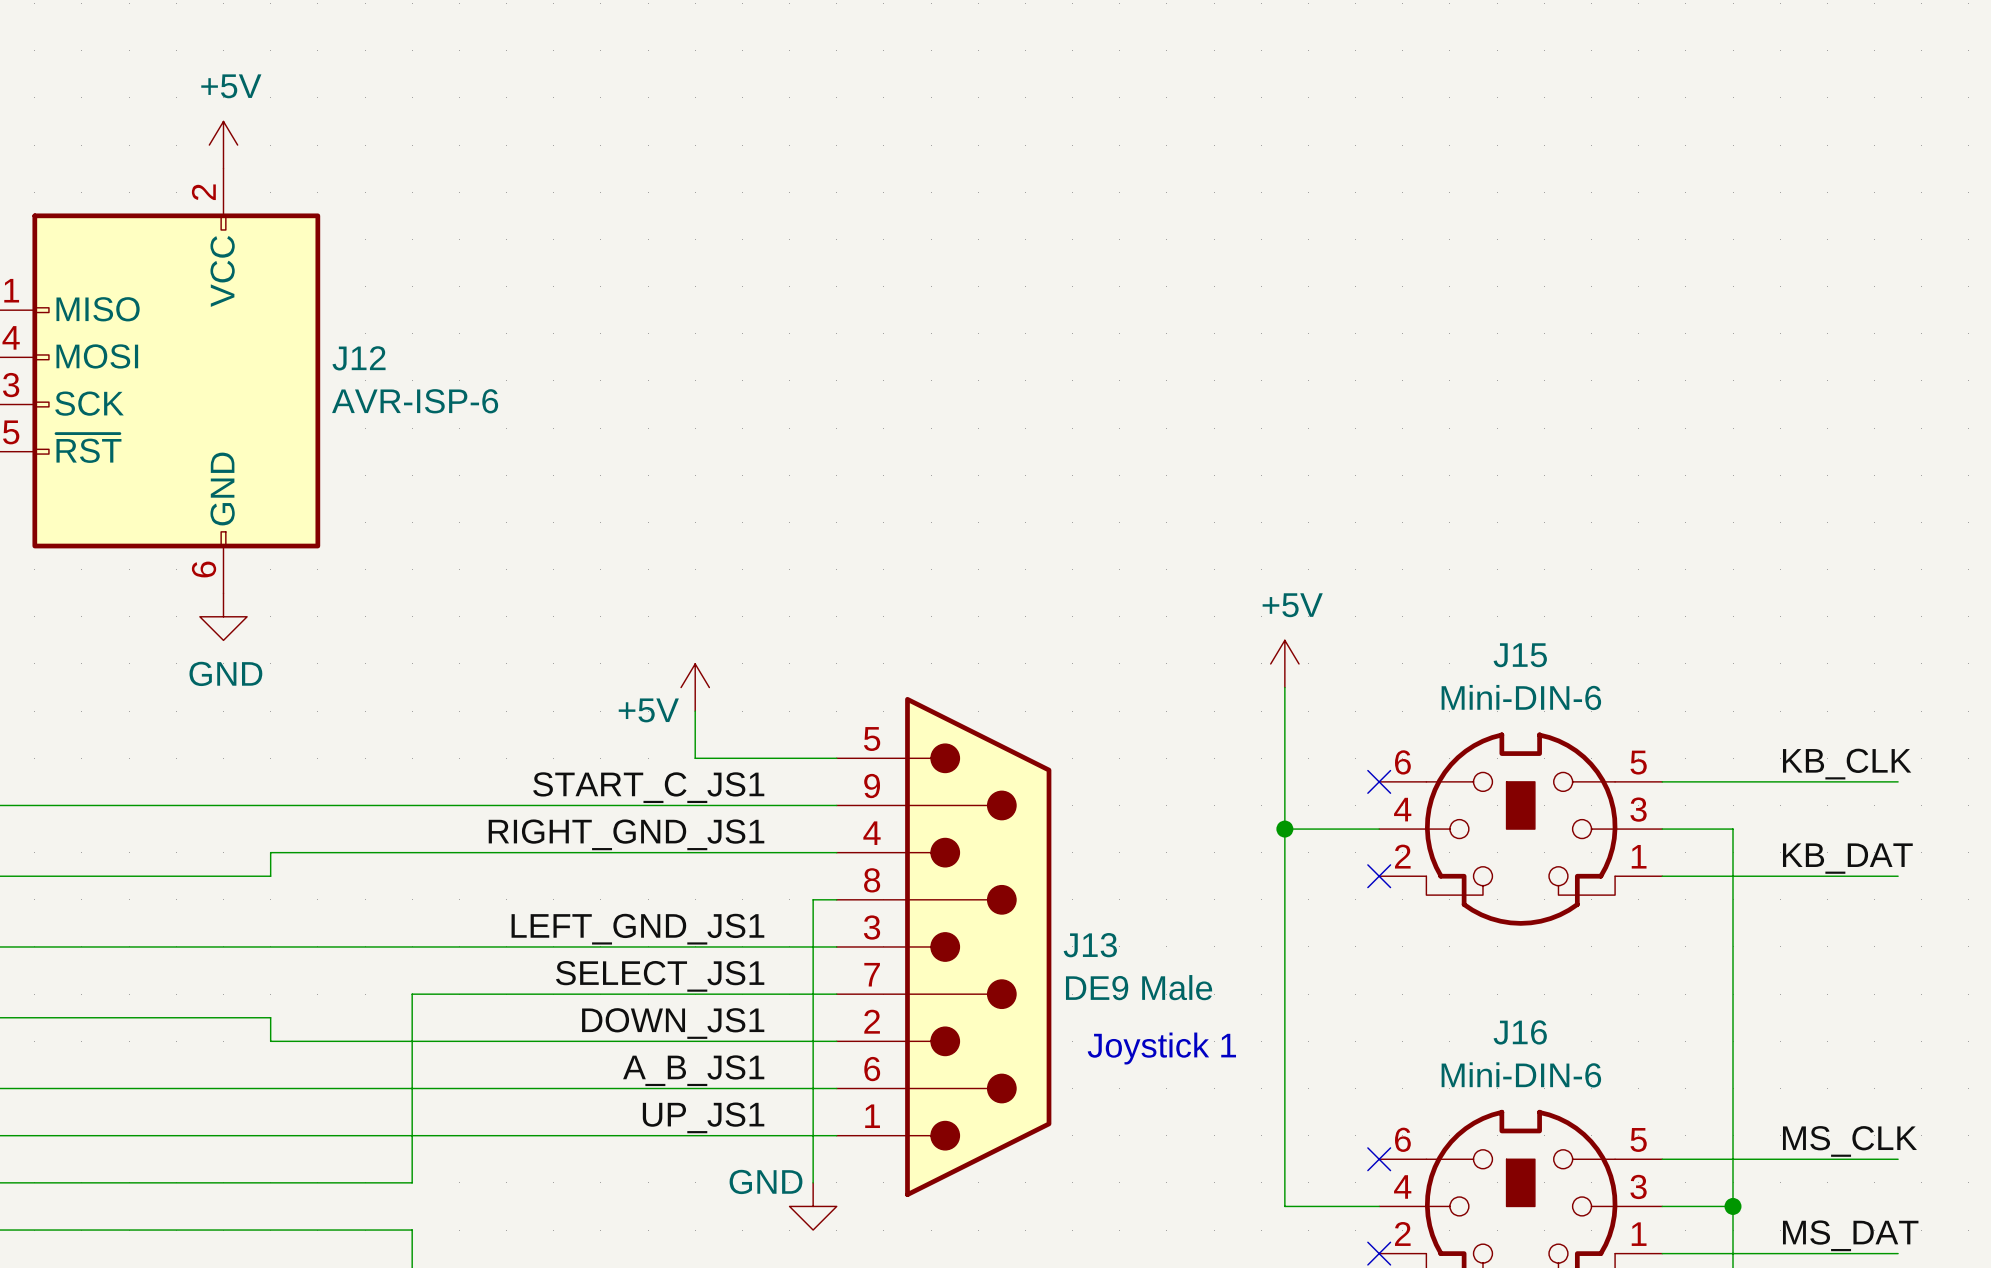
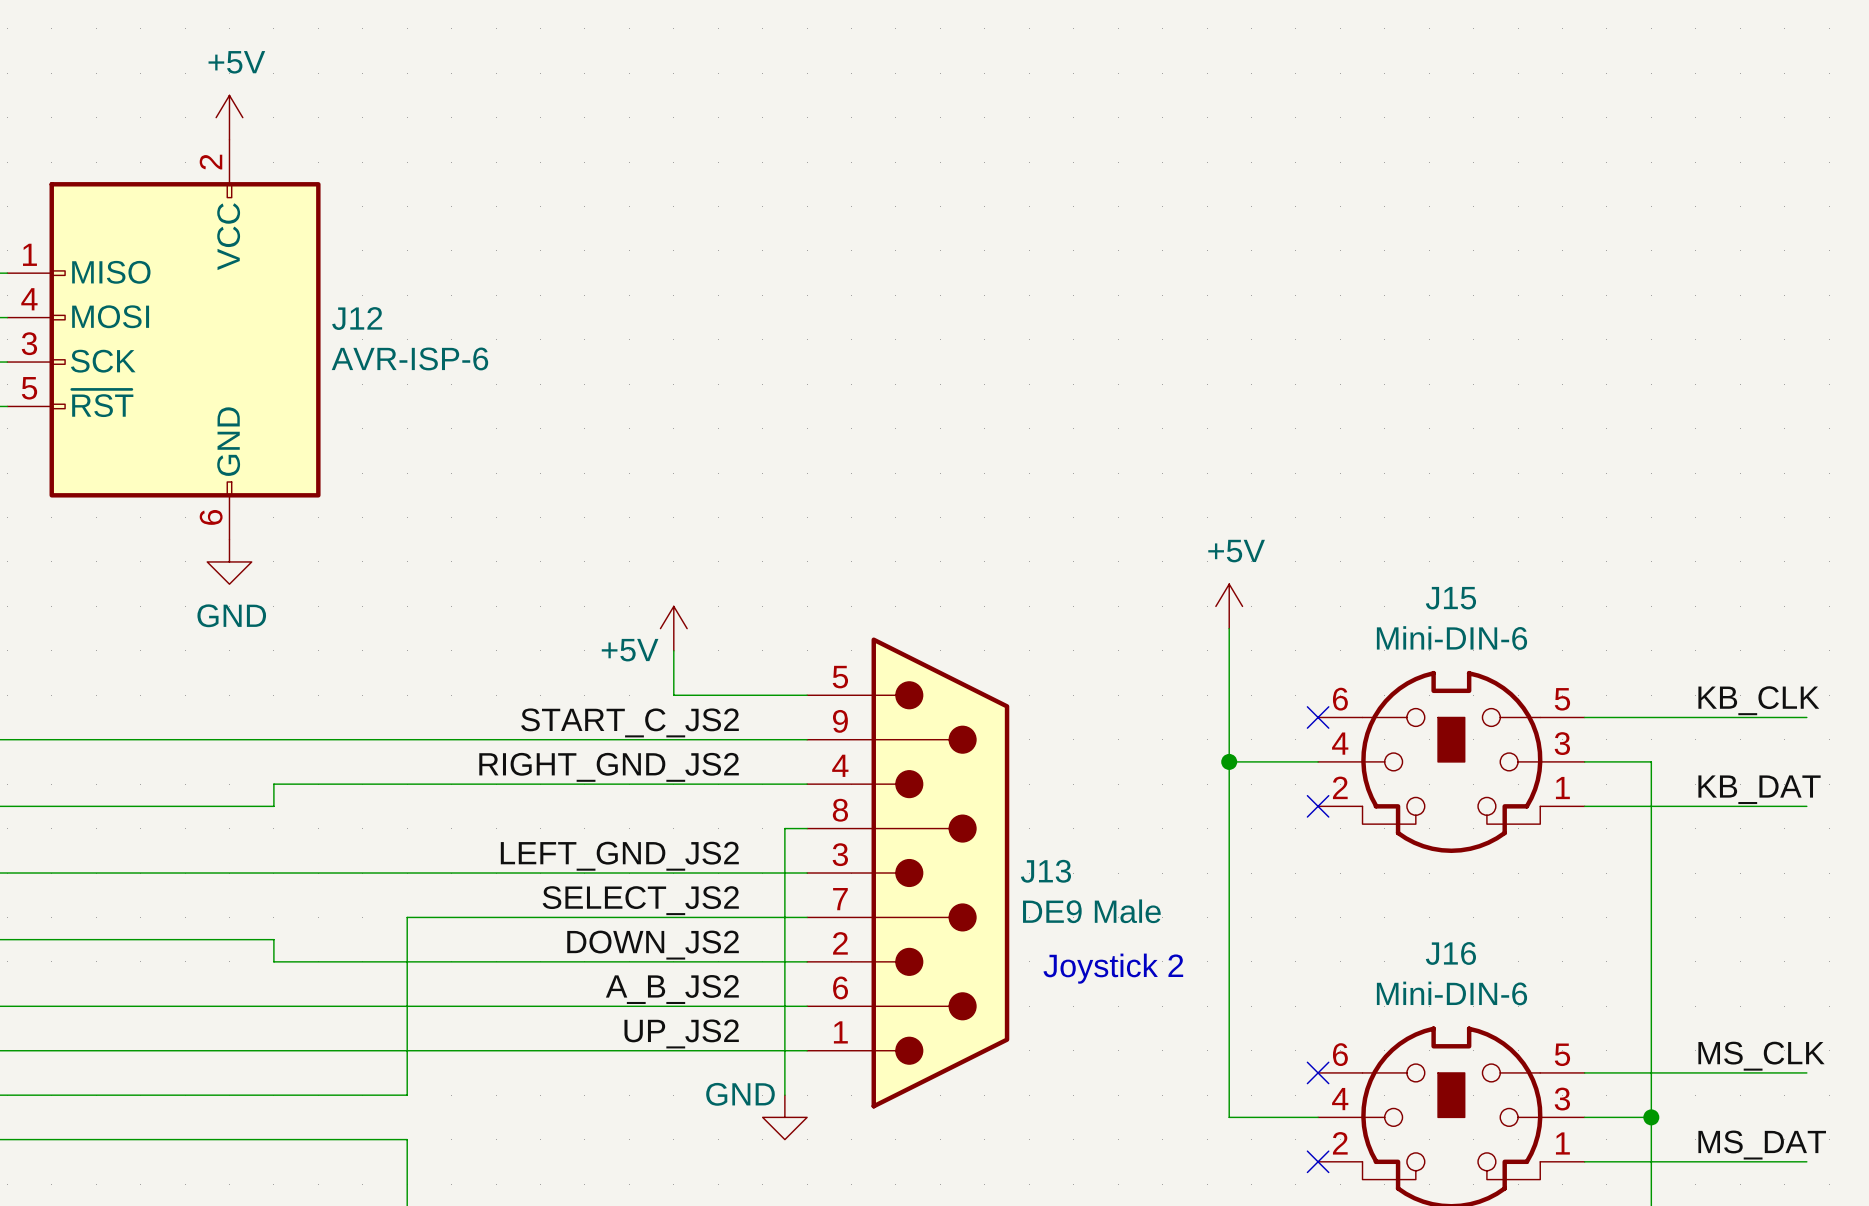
label: START_C_JS1 (648, 787) -> START_C_JS2 (630, 722)
label: RIGHT_GND_JS1 (626, 834) -> RIGHT_GND_JS2 (609, 767)
label: LEFT_GND_JS1 (637, 929) -> LEFT_GND_JS2 (619, 856)
label: SELECT_JS1 (660, 976) -> SELECT_JS2 (640, 900)
label: DOWN_JS1 (673, 1023) -> DOWN_JS2 (653, 945)
text: Joystick 1 (1161, 1048) -> Joystick 2 (1113, 968)
label: A_B_JS1 (693, 1070) -> A_B_JS2 (672, 989)
label: UP_JS1 (703, 1117) -> UP_JS2 (681, 1033)

